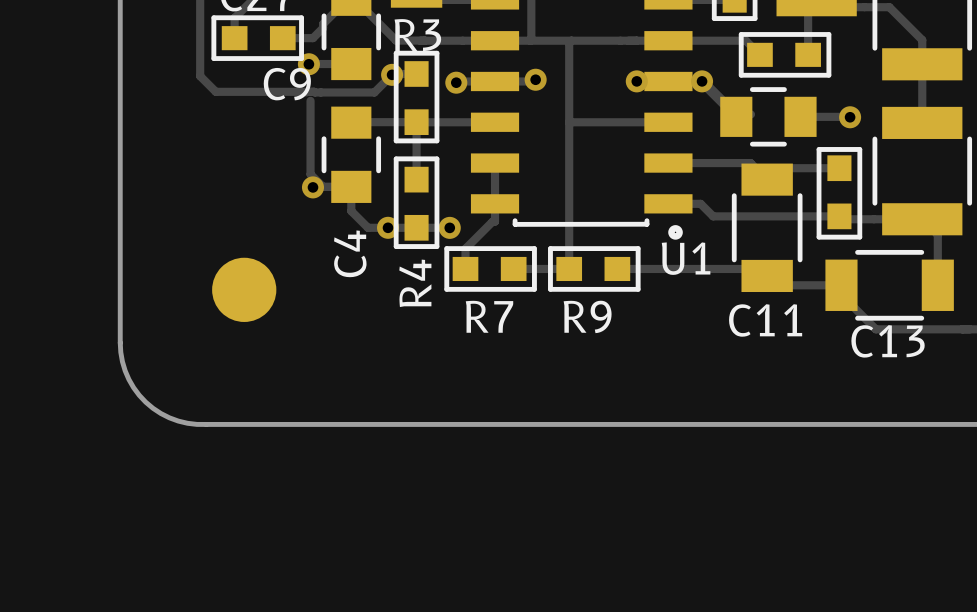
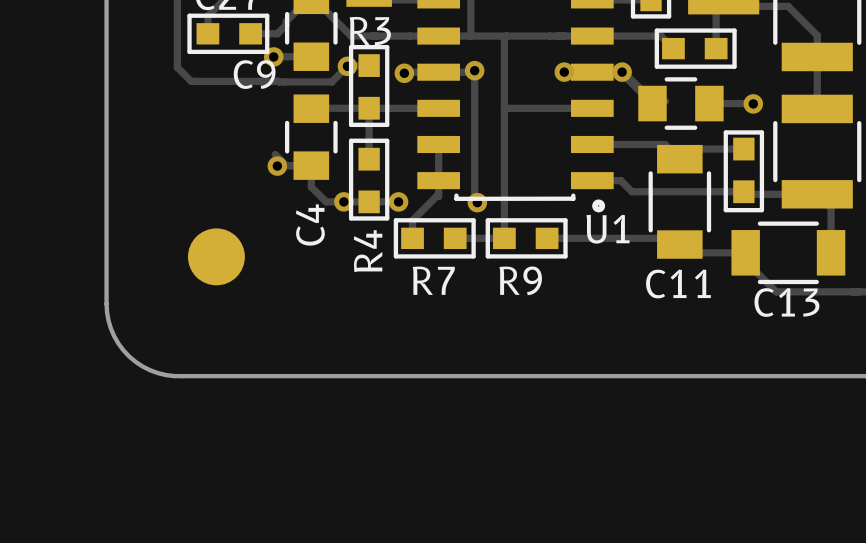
track: none -> (474, 70) (474, 199) (477, 202)
track: (310, 100) (310, 174) -> none
via: none -> (477, 202)

